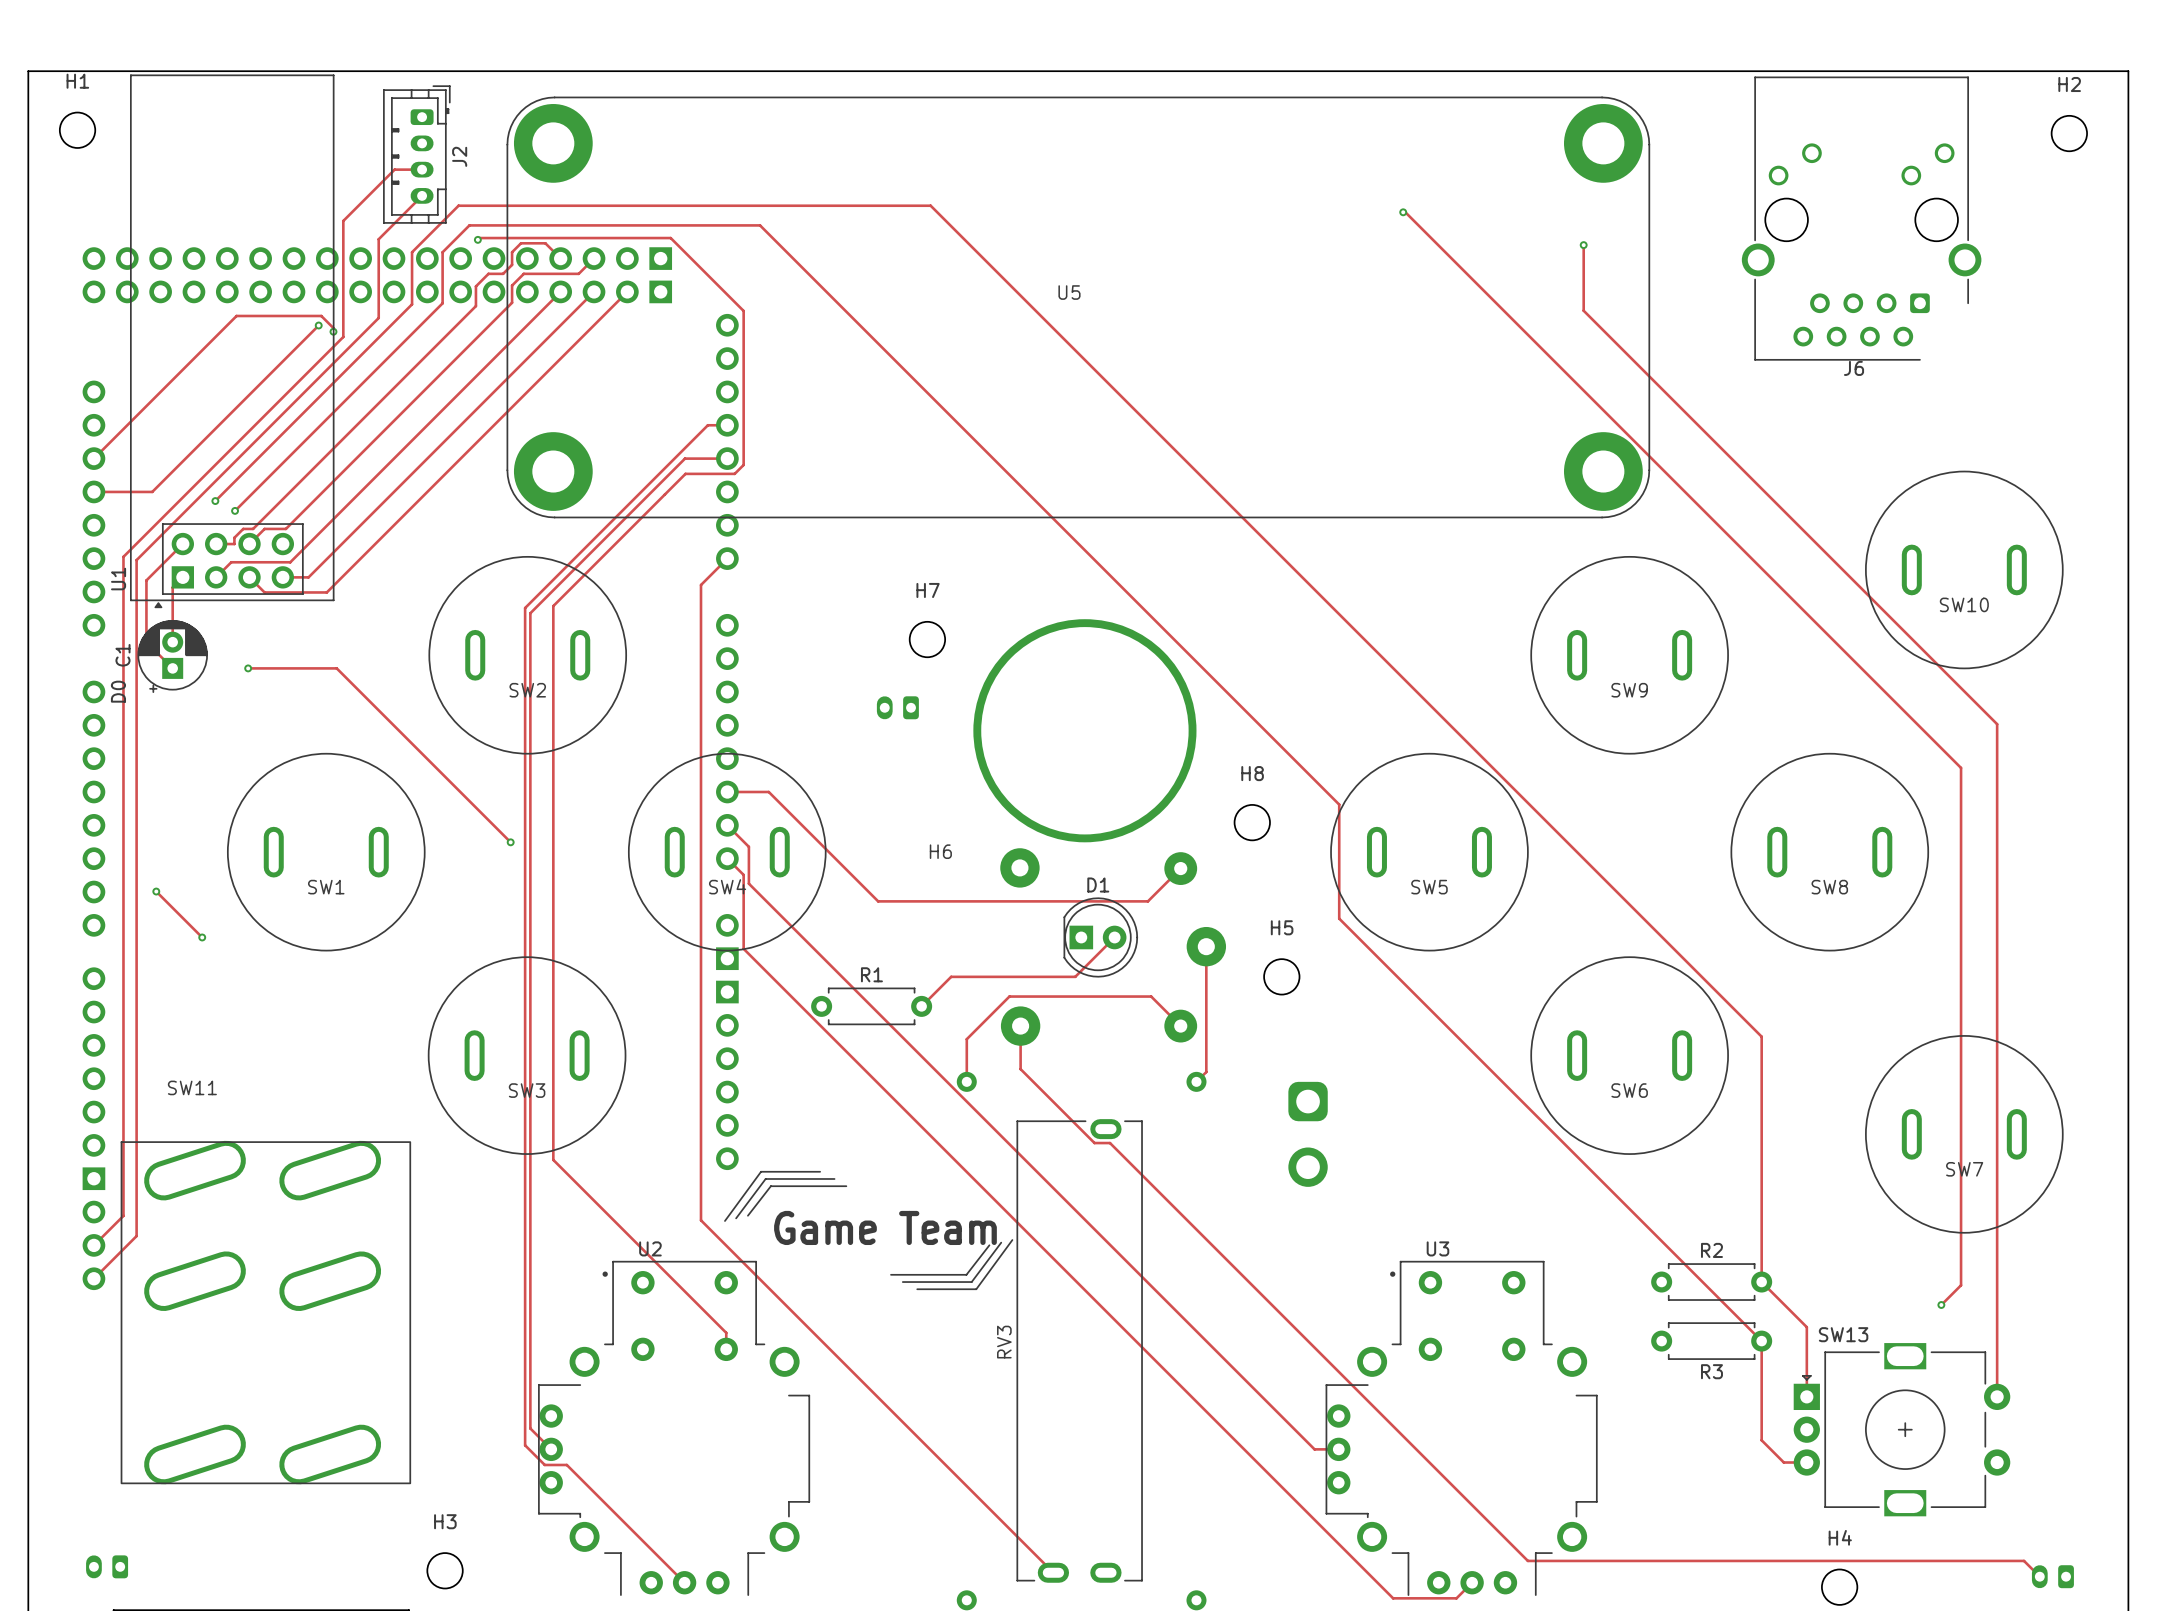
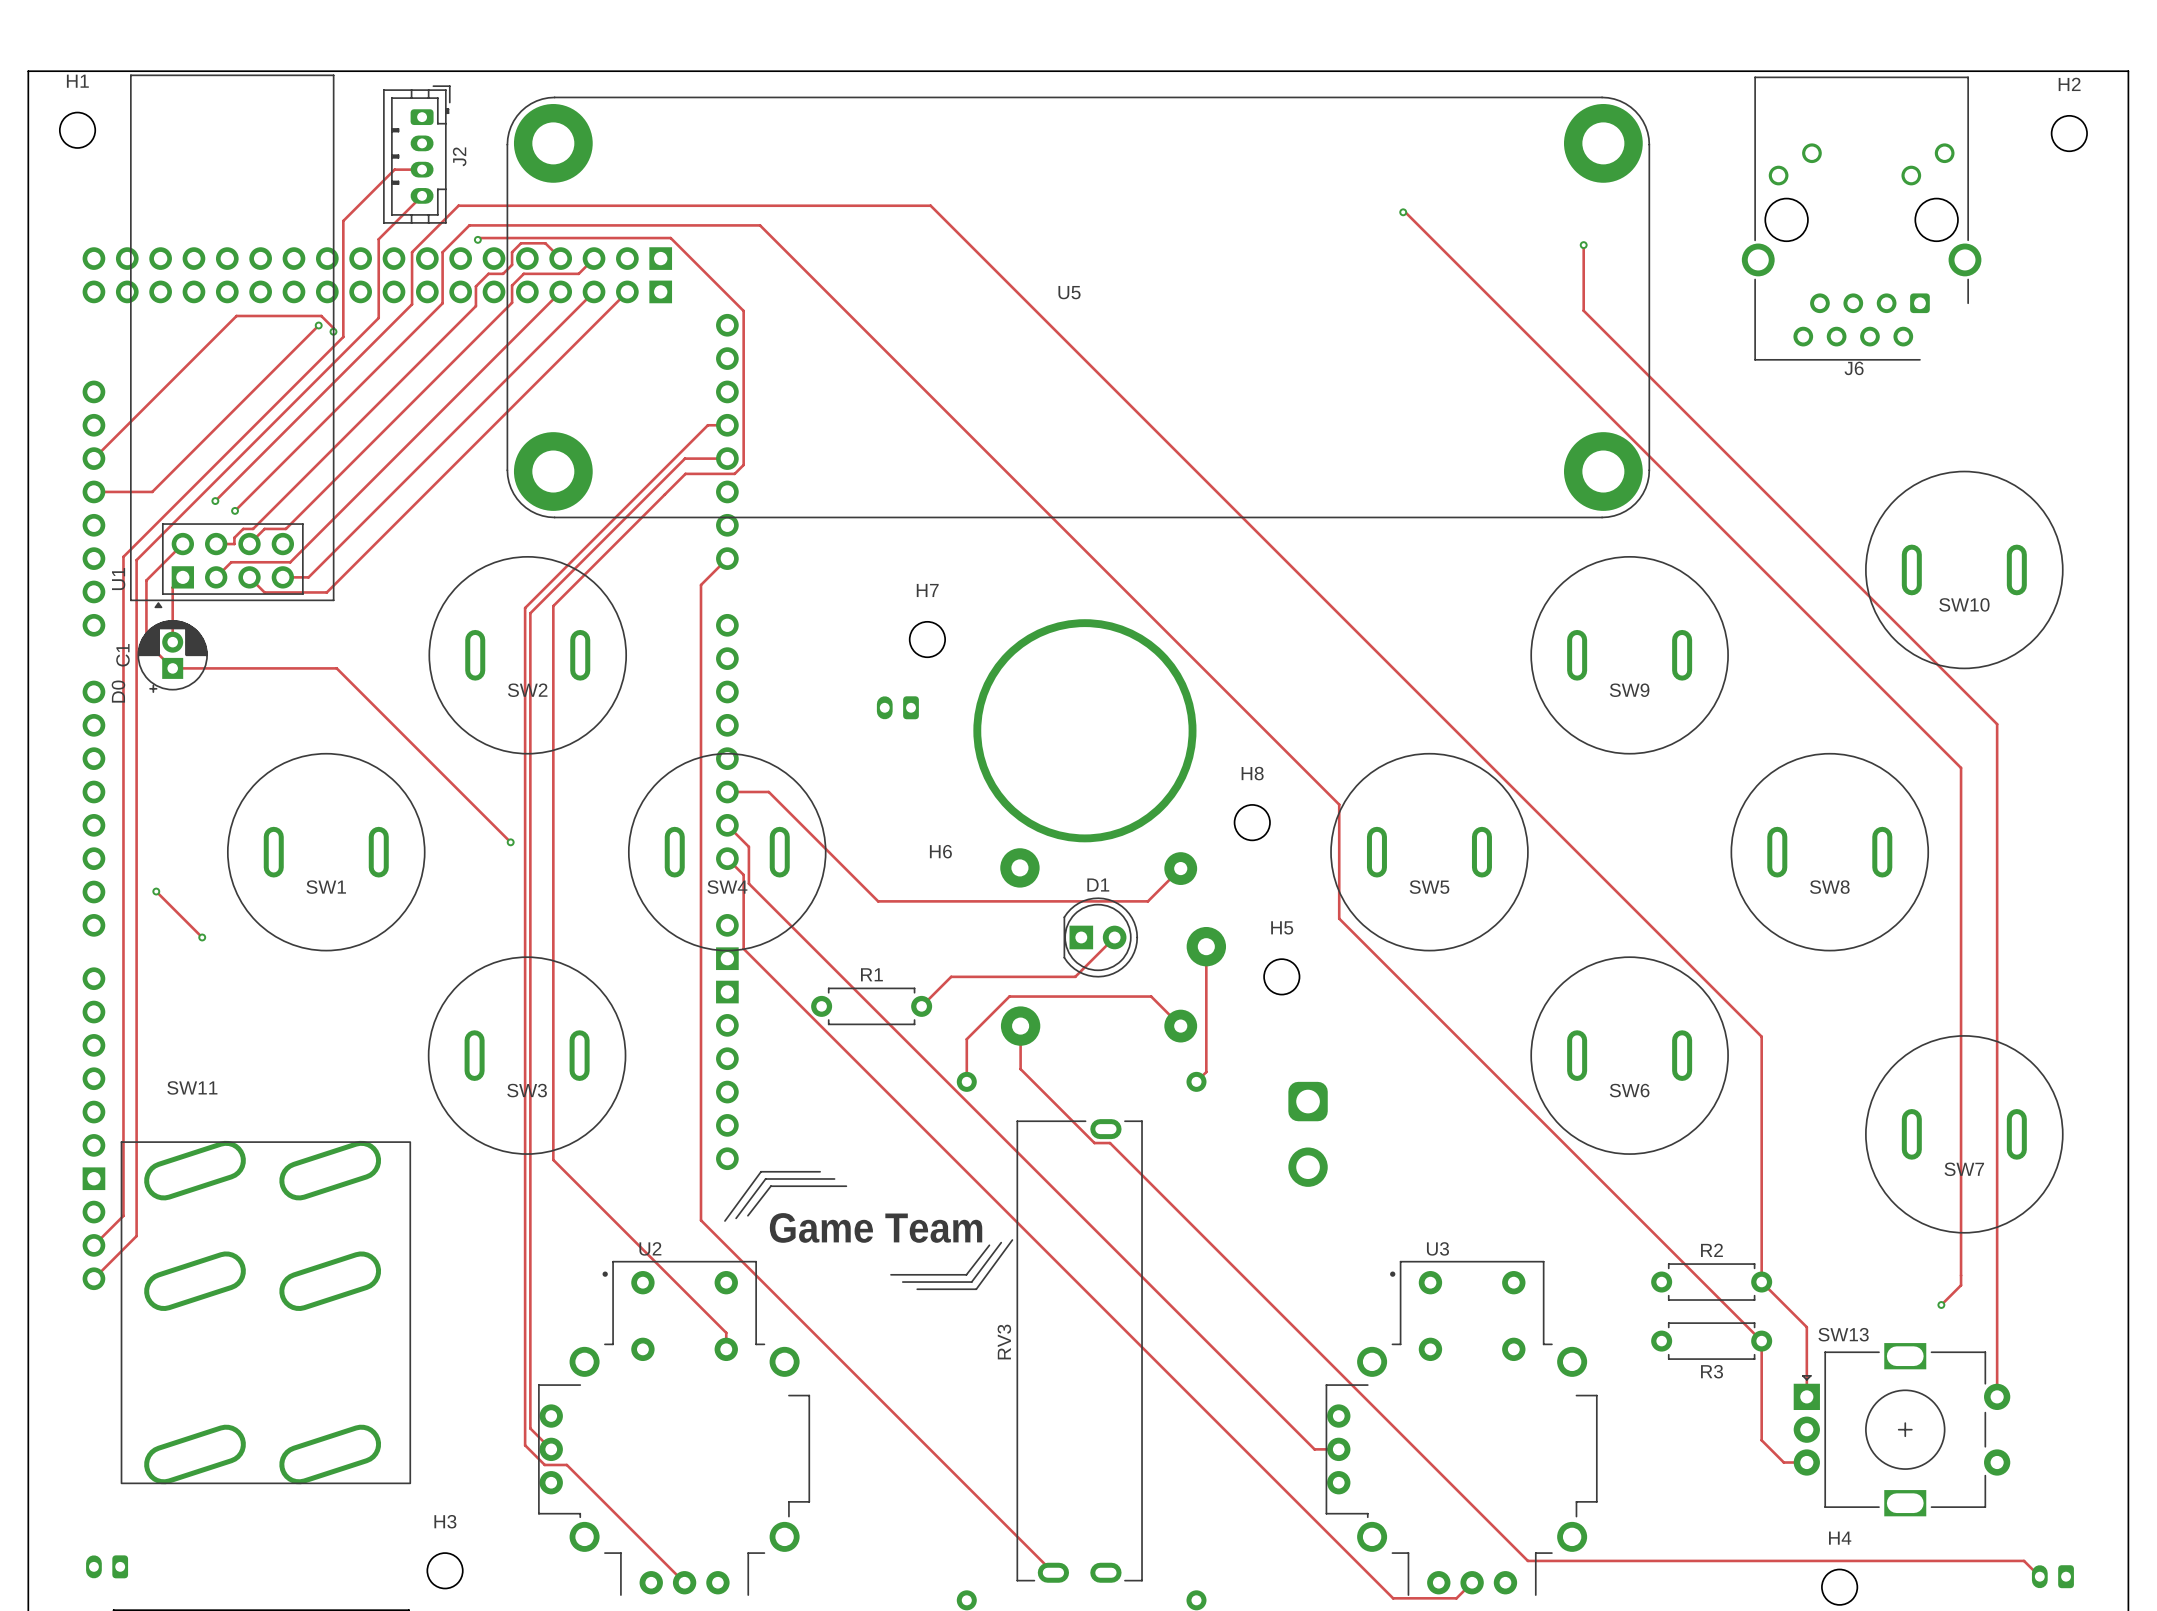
track: none -> (172, 668) (248, 668)
via: (248, 668) -> none

